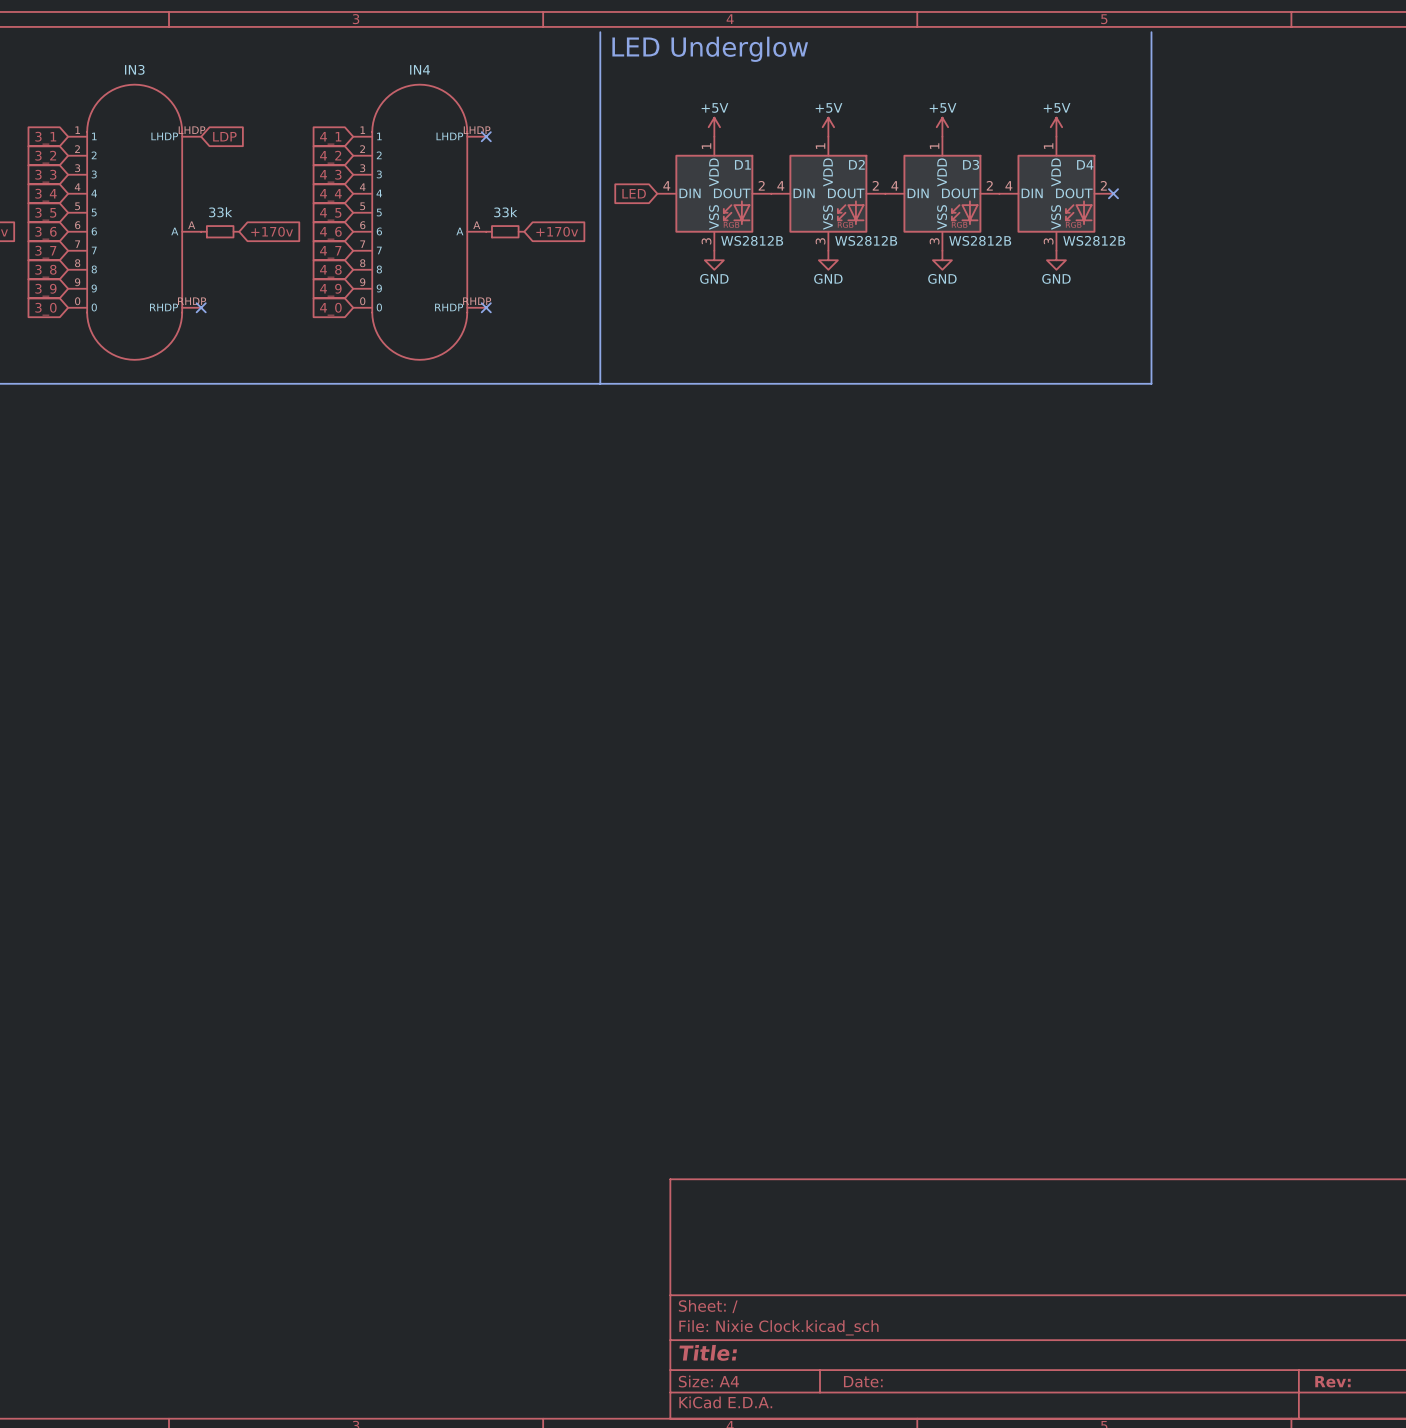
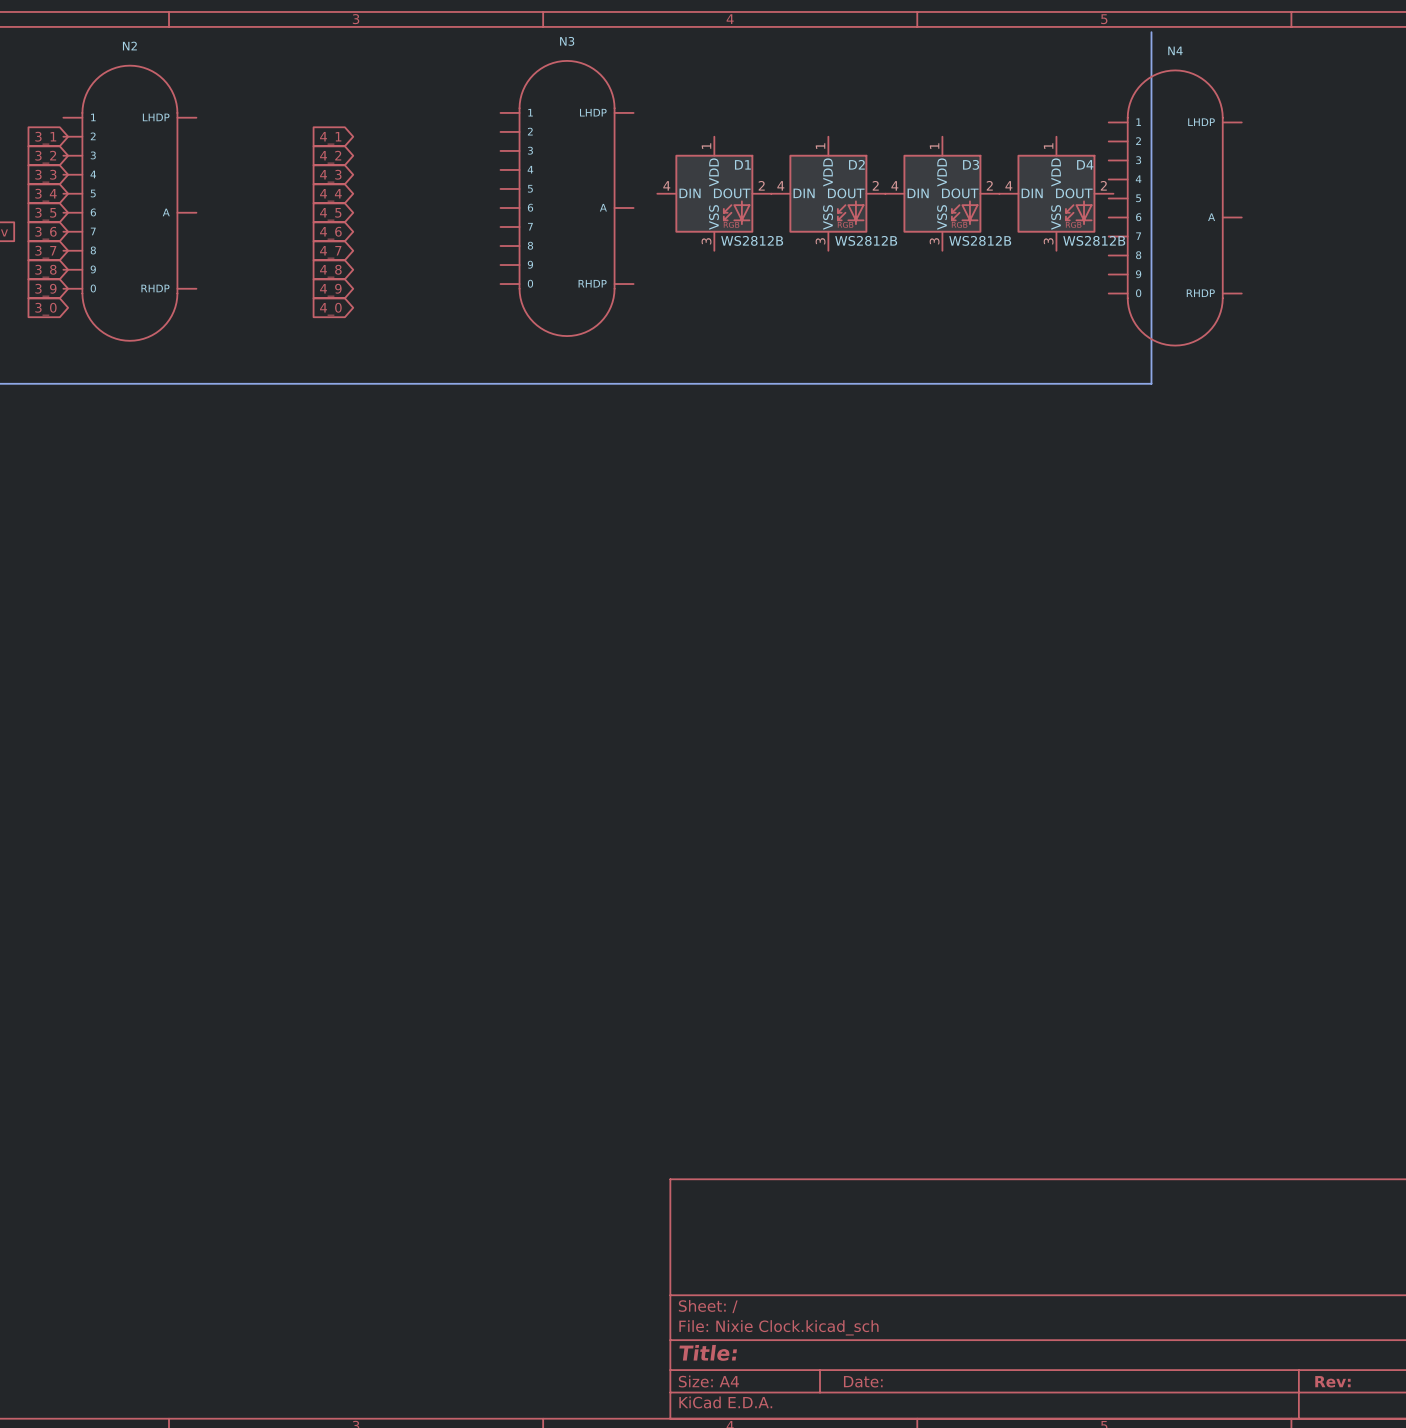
line: (600, 32) (600, 383) -> none
text: LED Underglow (710, 49) -> none
power symbol: +5V (714, 127) -> none
power symbol: +5V (828, 127) -> none
power symbol: +5V (942, 127) -> none
power symbol: +5V (1056, 127) -> none
global label: LDP (224, 136) -> none
no-connect mark: (486, 136) -> none
global label: LED (634, 193) -> none
no-connect mark: (1113, 193) -> none
N3: none -> (567, 198)
N2: none -> (129, 203)
N4: none -> (1175, 207)
IN3: (134, 222) -> none
IN4: (419, 222) -> none
part: 33k (220, 231) -> none
global label: +170v (272, 231) -> none
part: 33k (505, 231) -> none
global label: +170v (557, 231) -> none
power symbol: GND (714, 260) -> none
power symbol: GND (828, 260) -> none
power symbol: GND (942, 260) -> none
power symbol: GND (1056, 260) -> none
no-connect mark: (201, 307) -> none
no-connect mark: (486, 307) -> none

